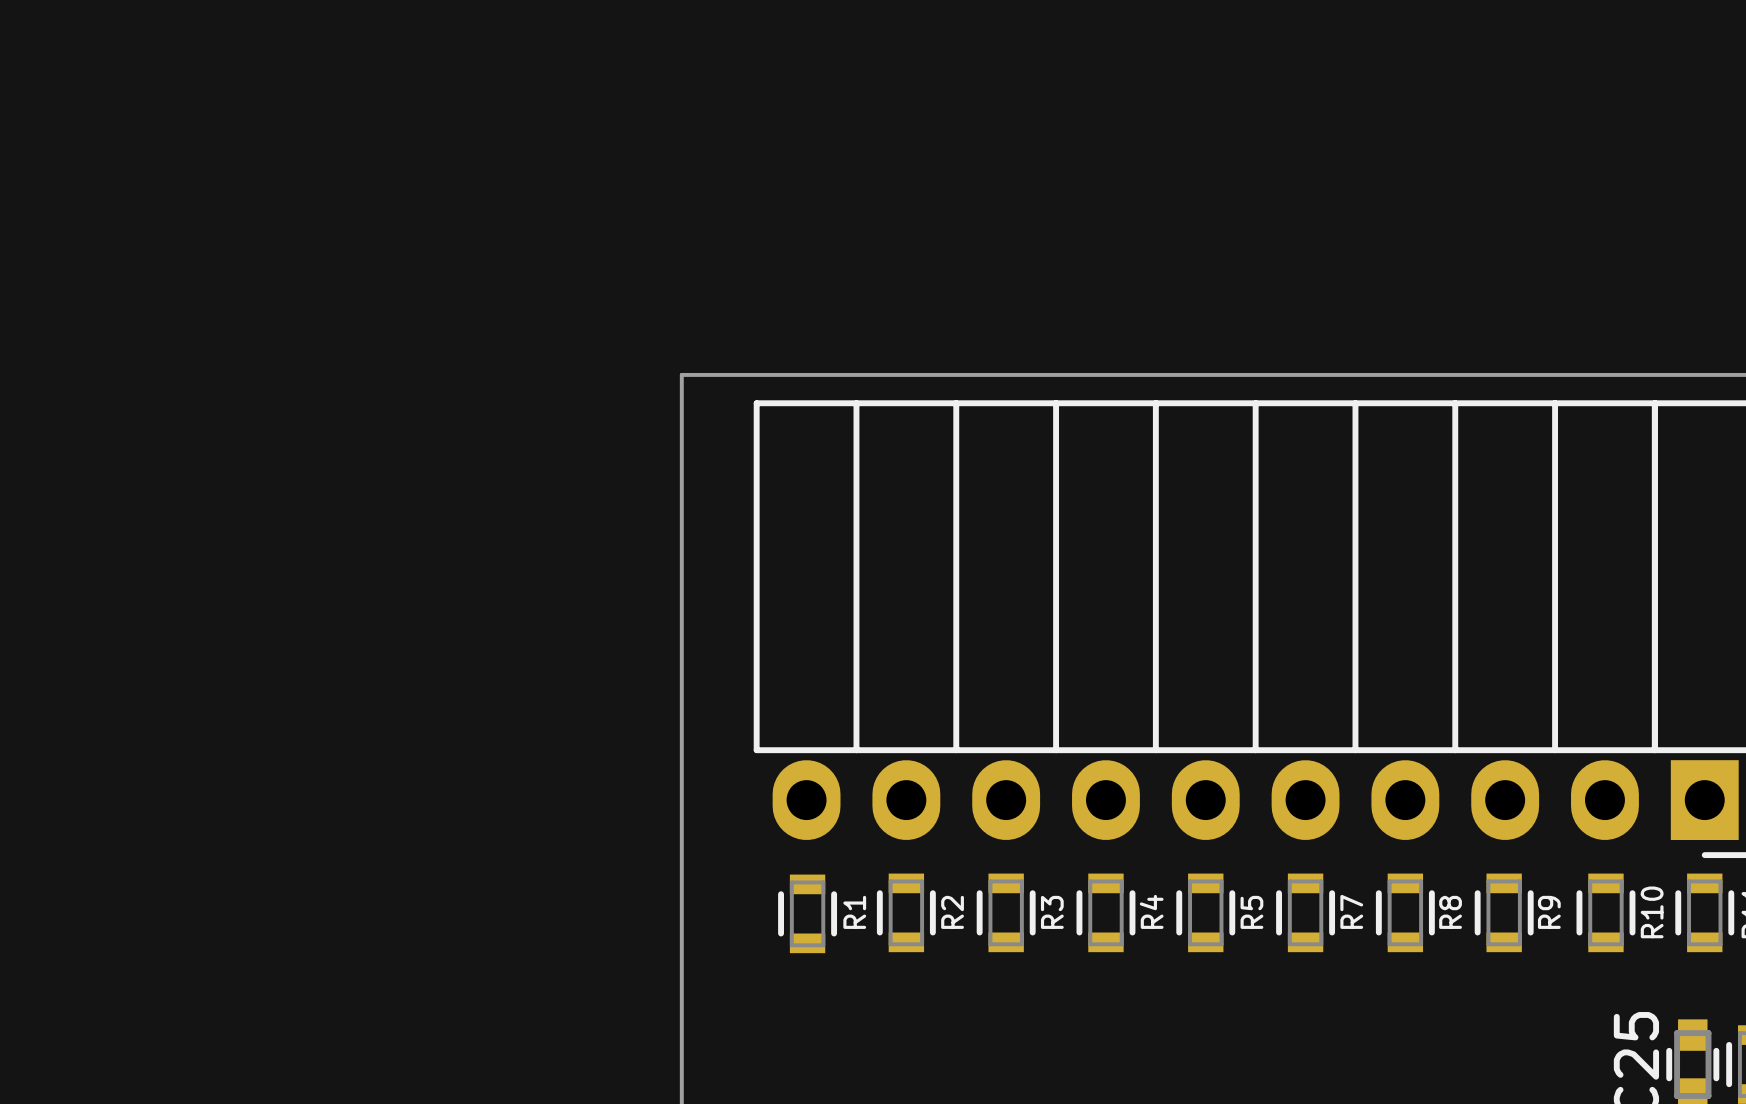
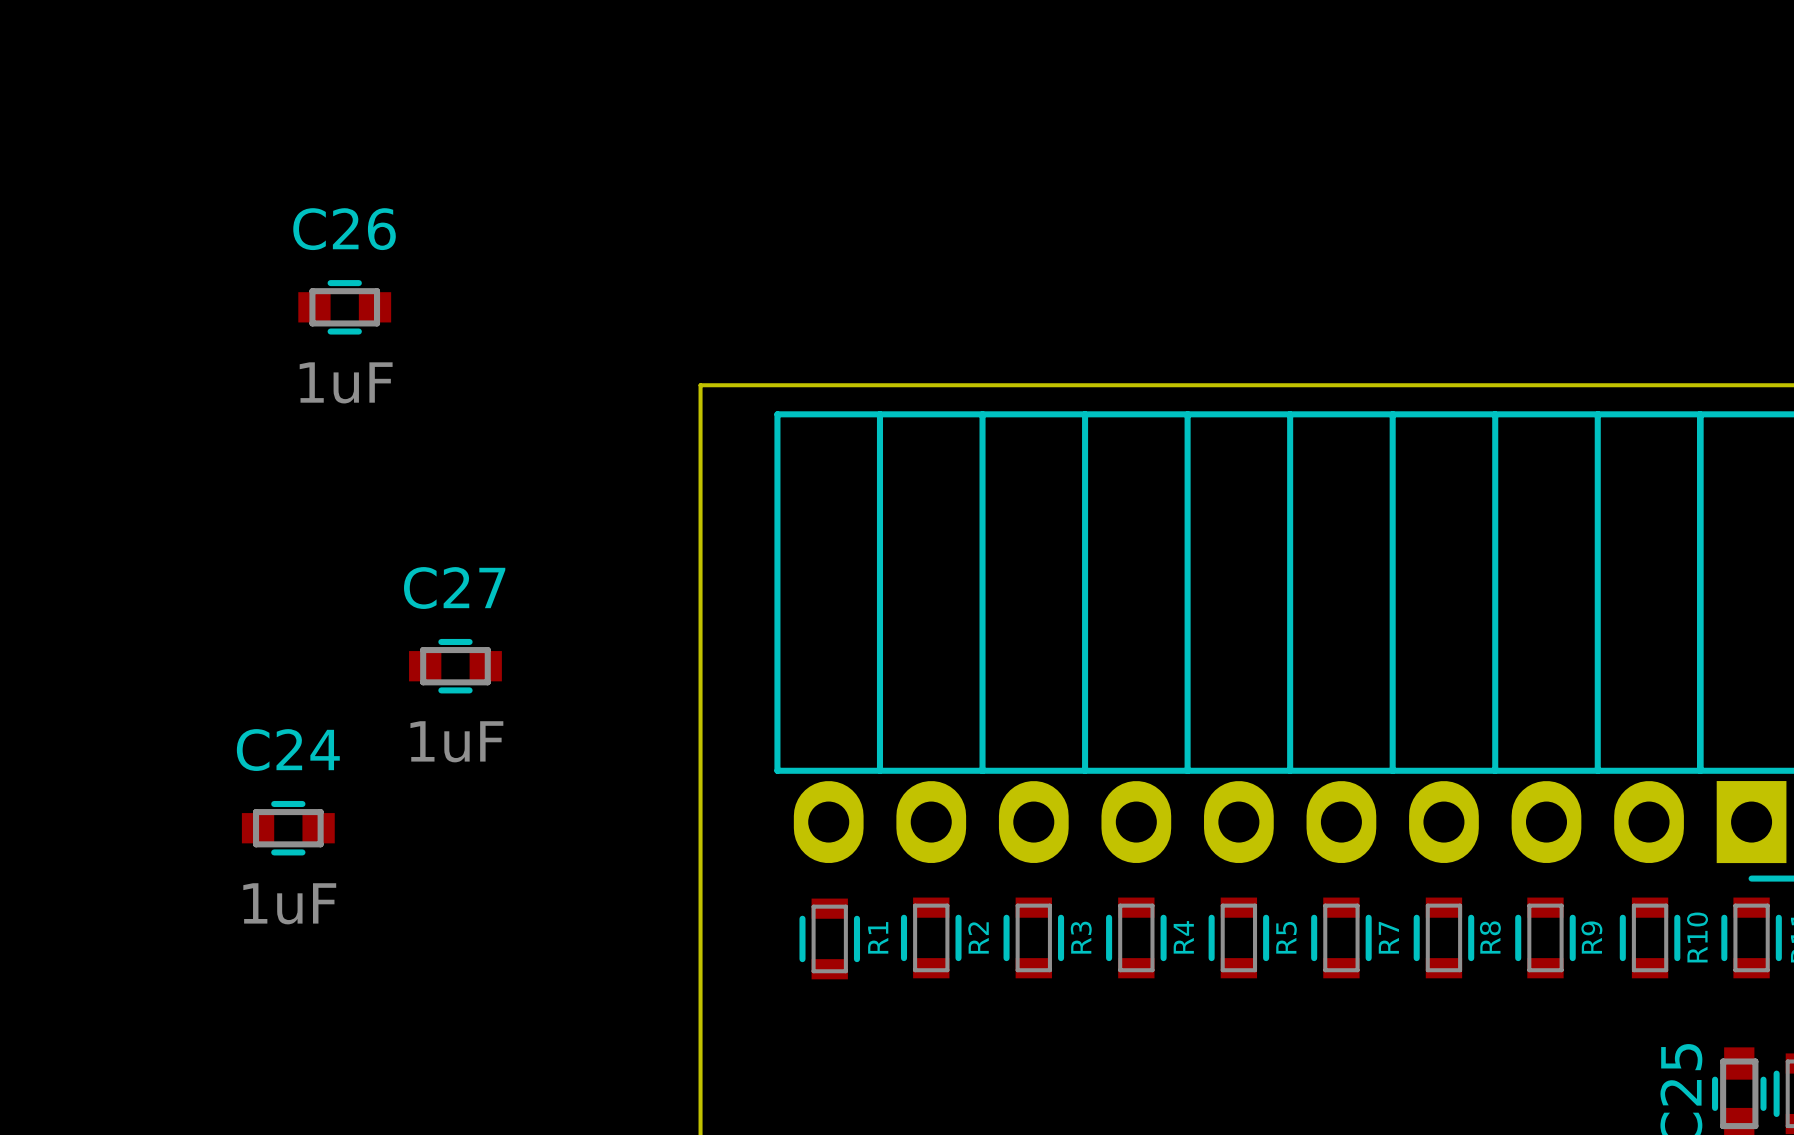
C26: none -> 1uF (344, 307)
C27: none -> 1uF (455, 666)
C24: none -> 1uF (288, 828)

